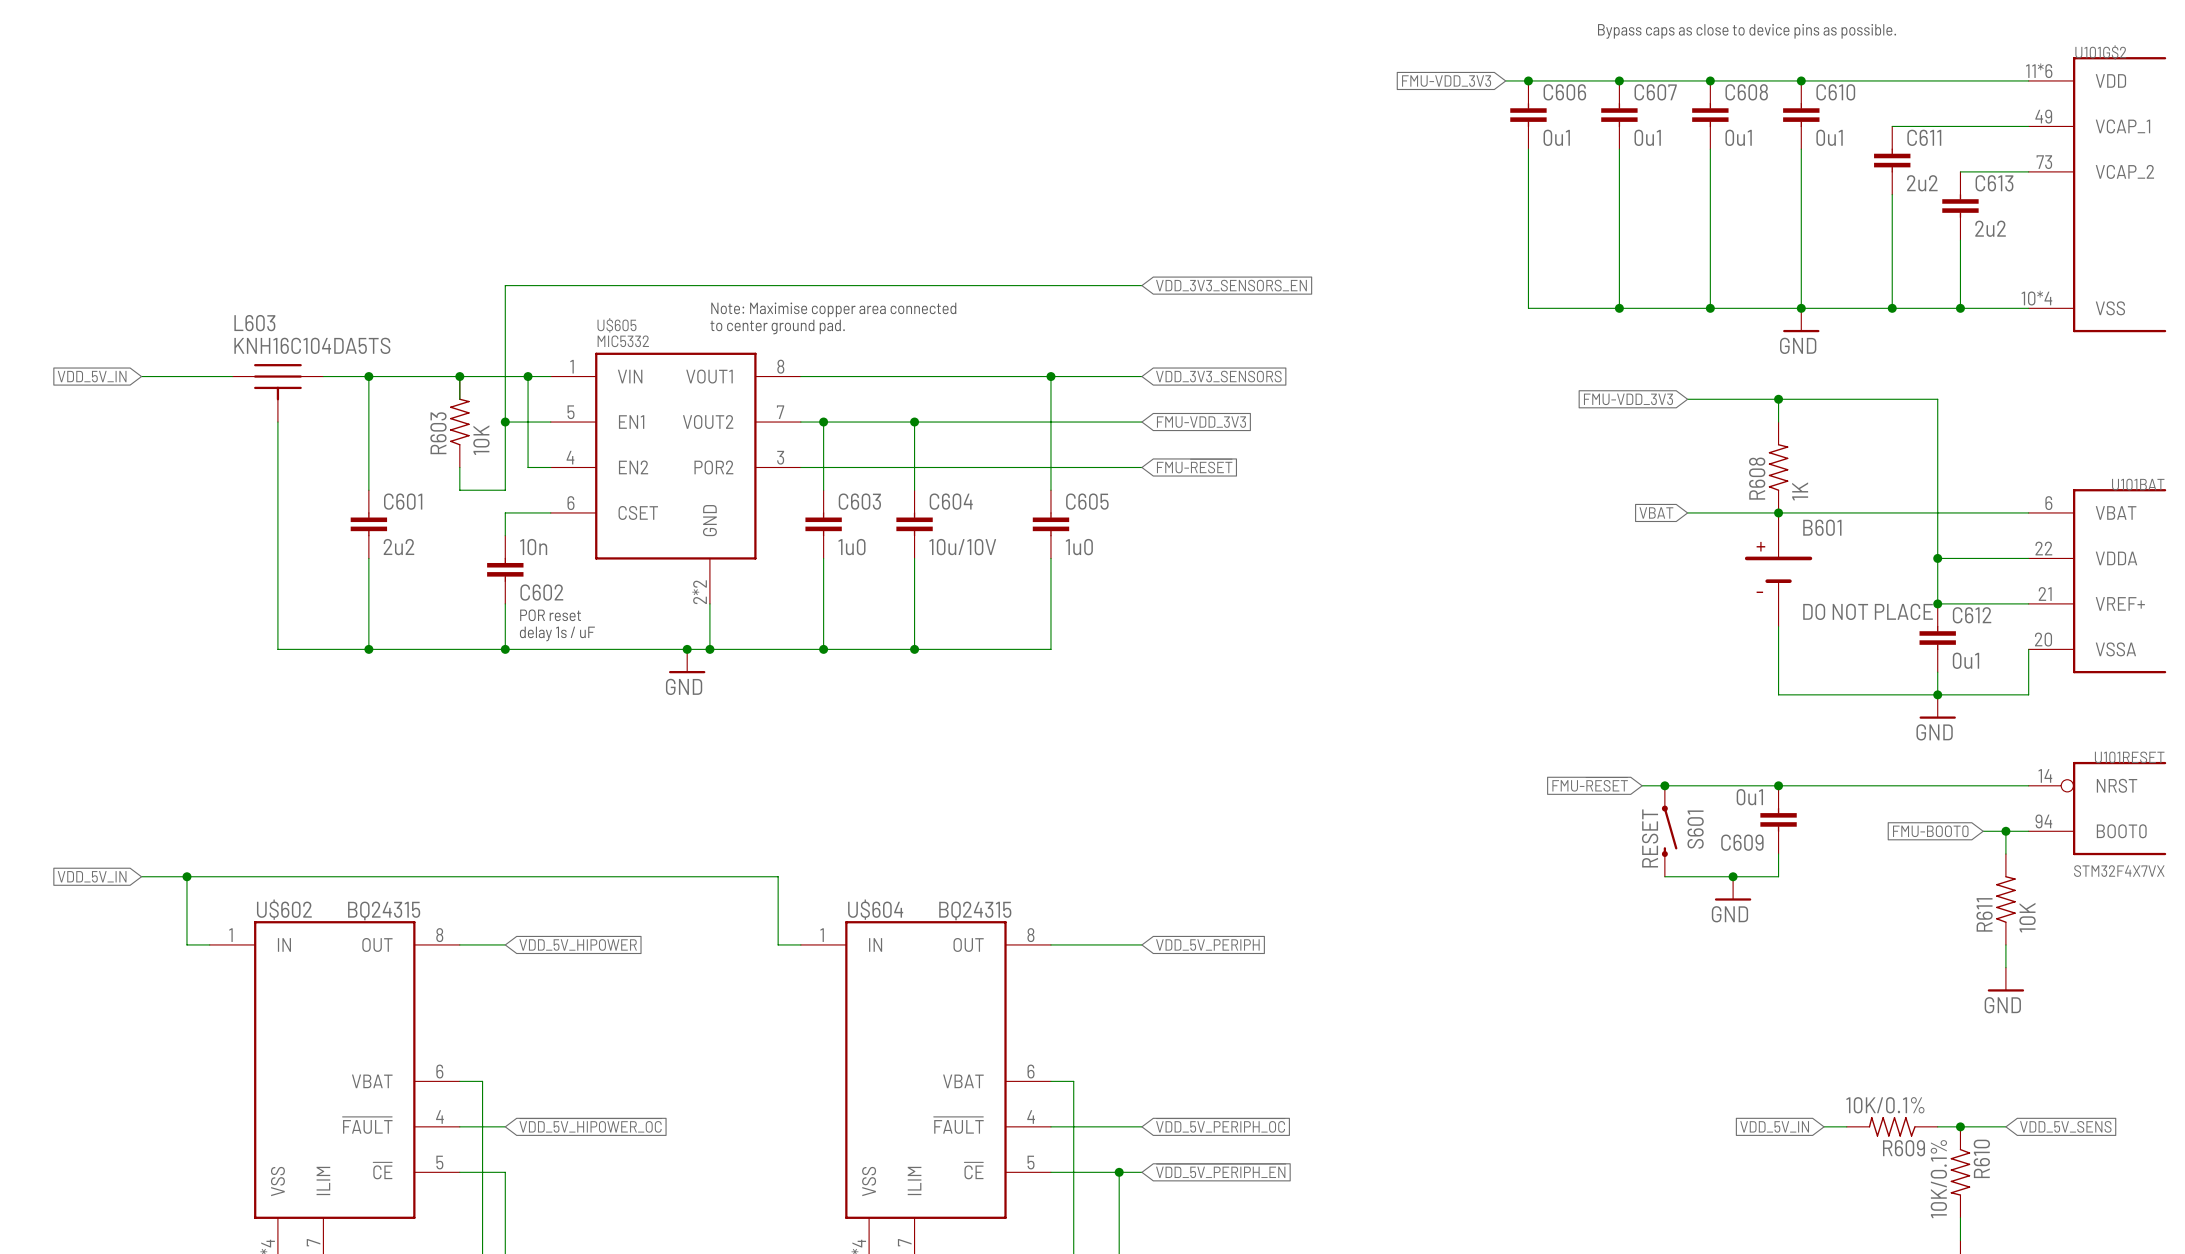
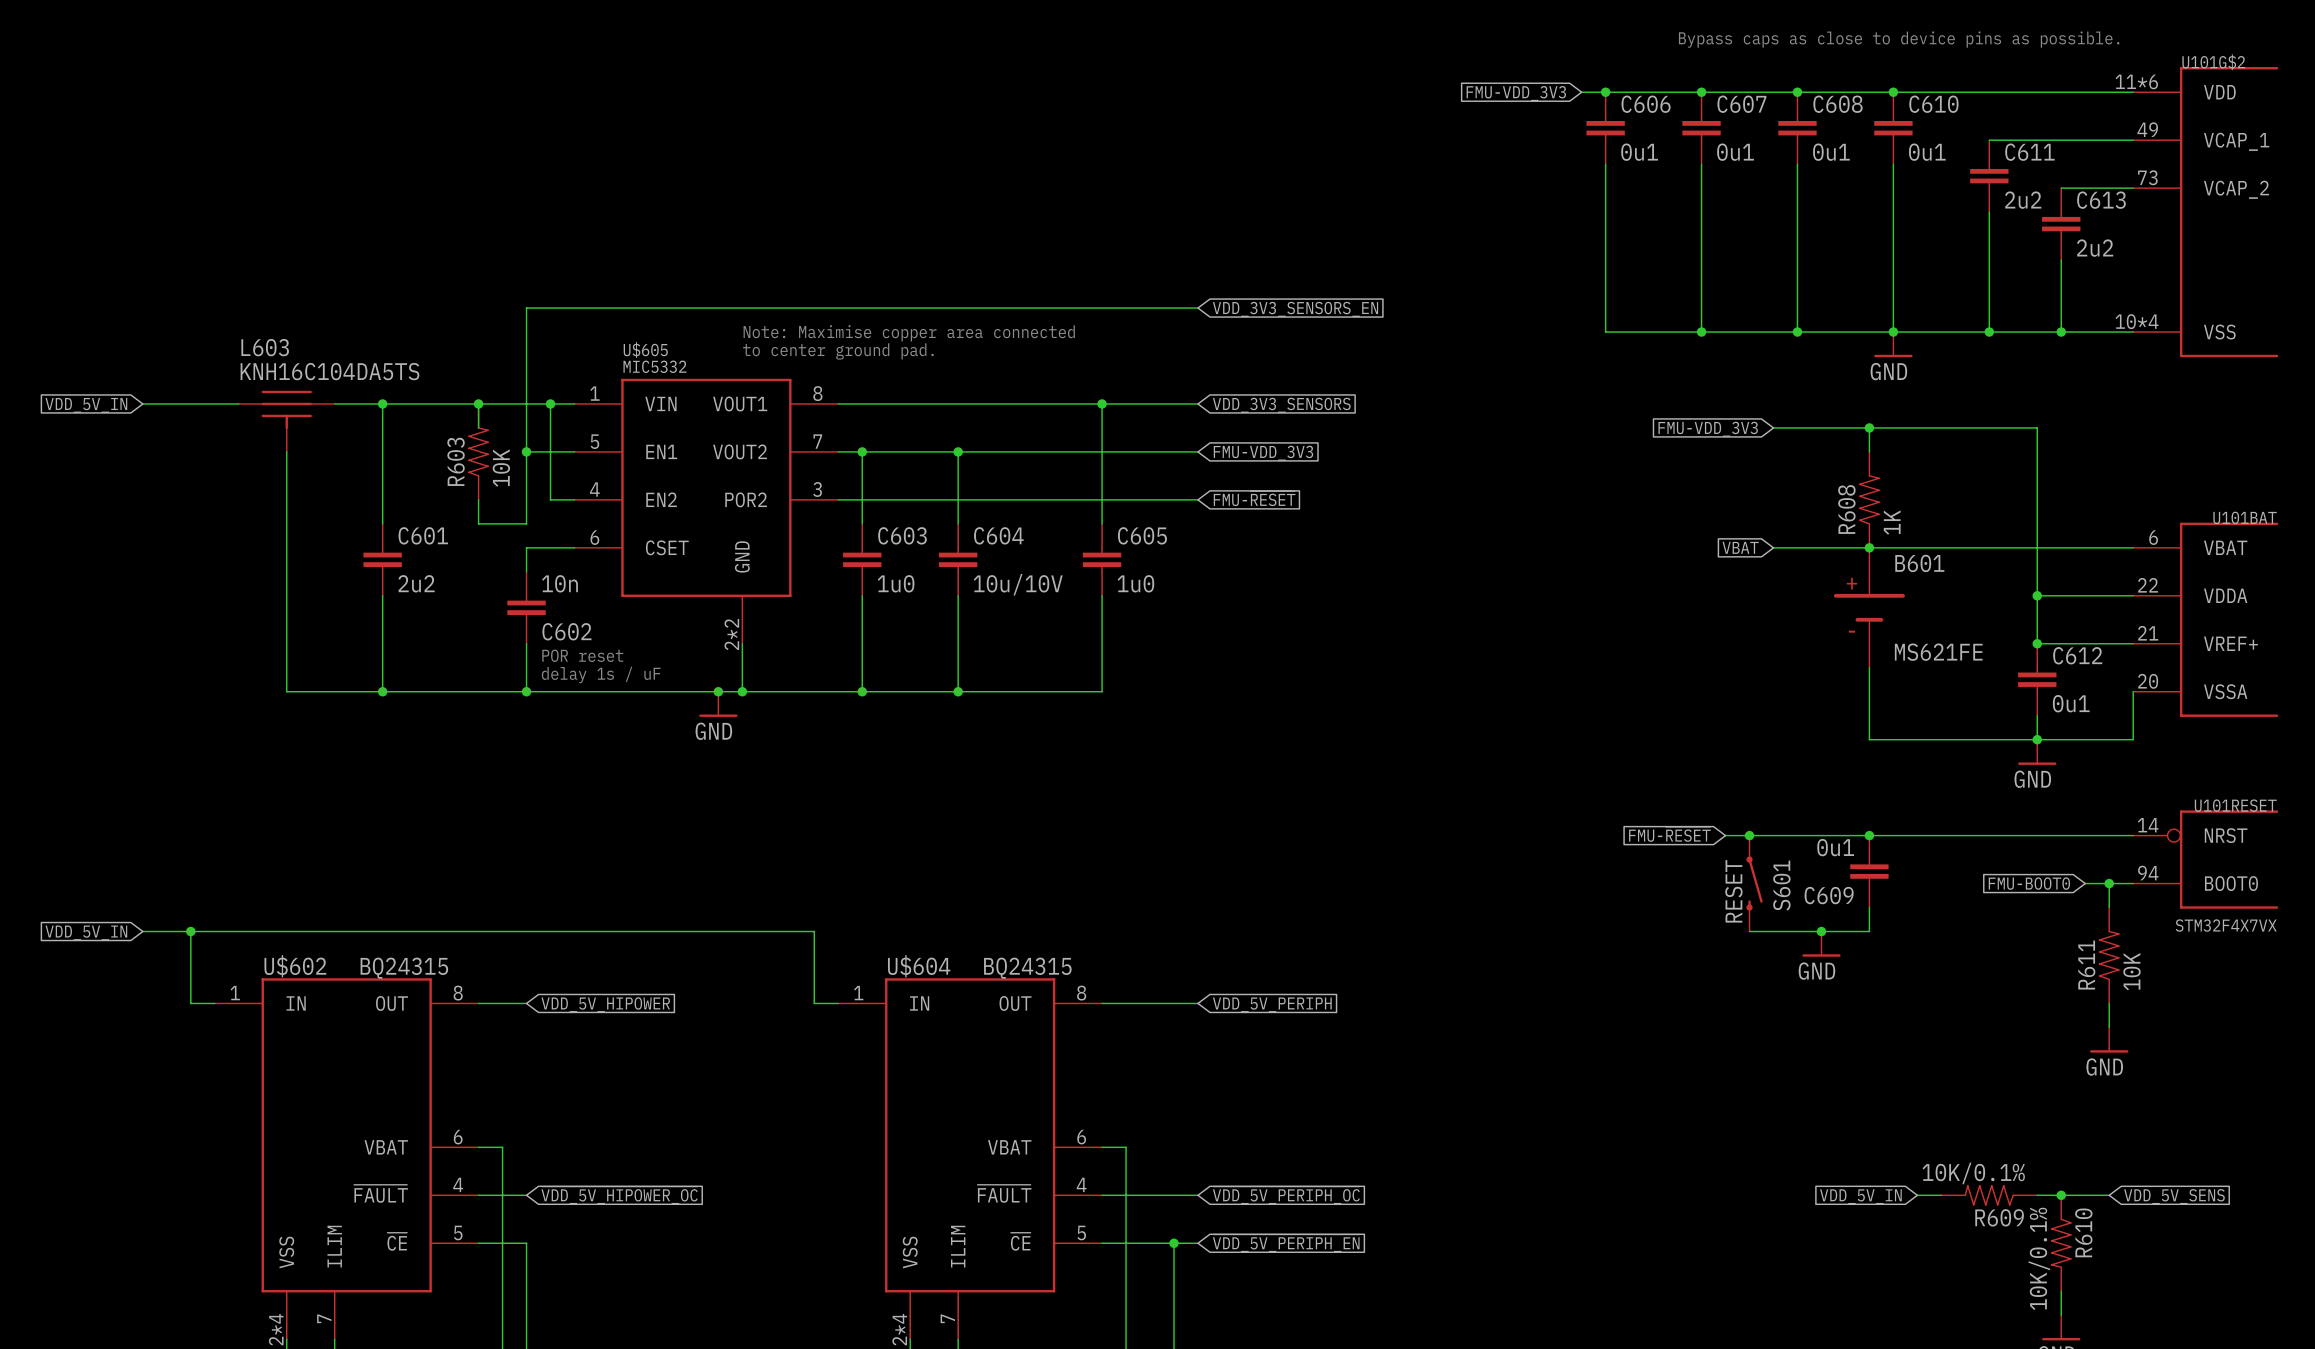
B601 value: DO NOT PLACE (1868, 611) -> MS621FE (1938, 652)

